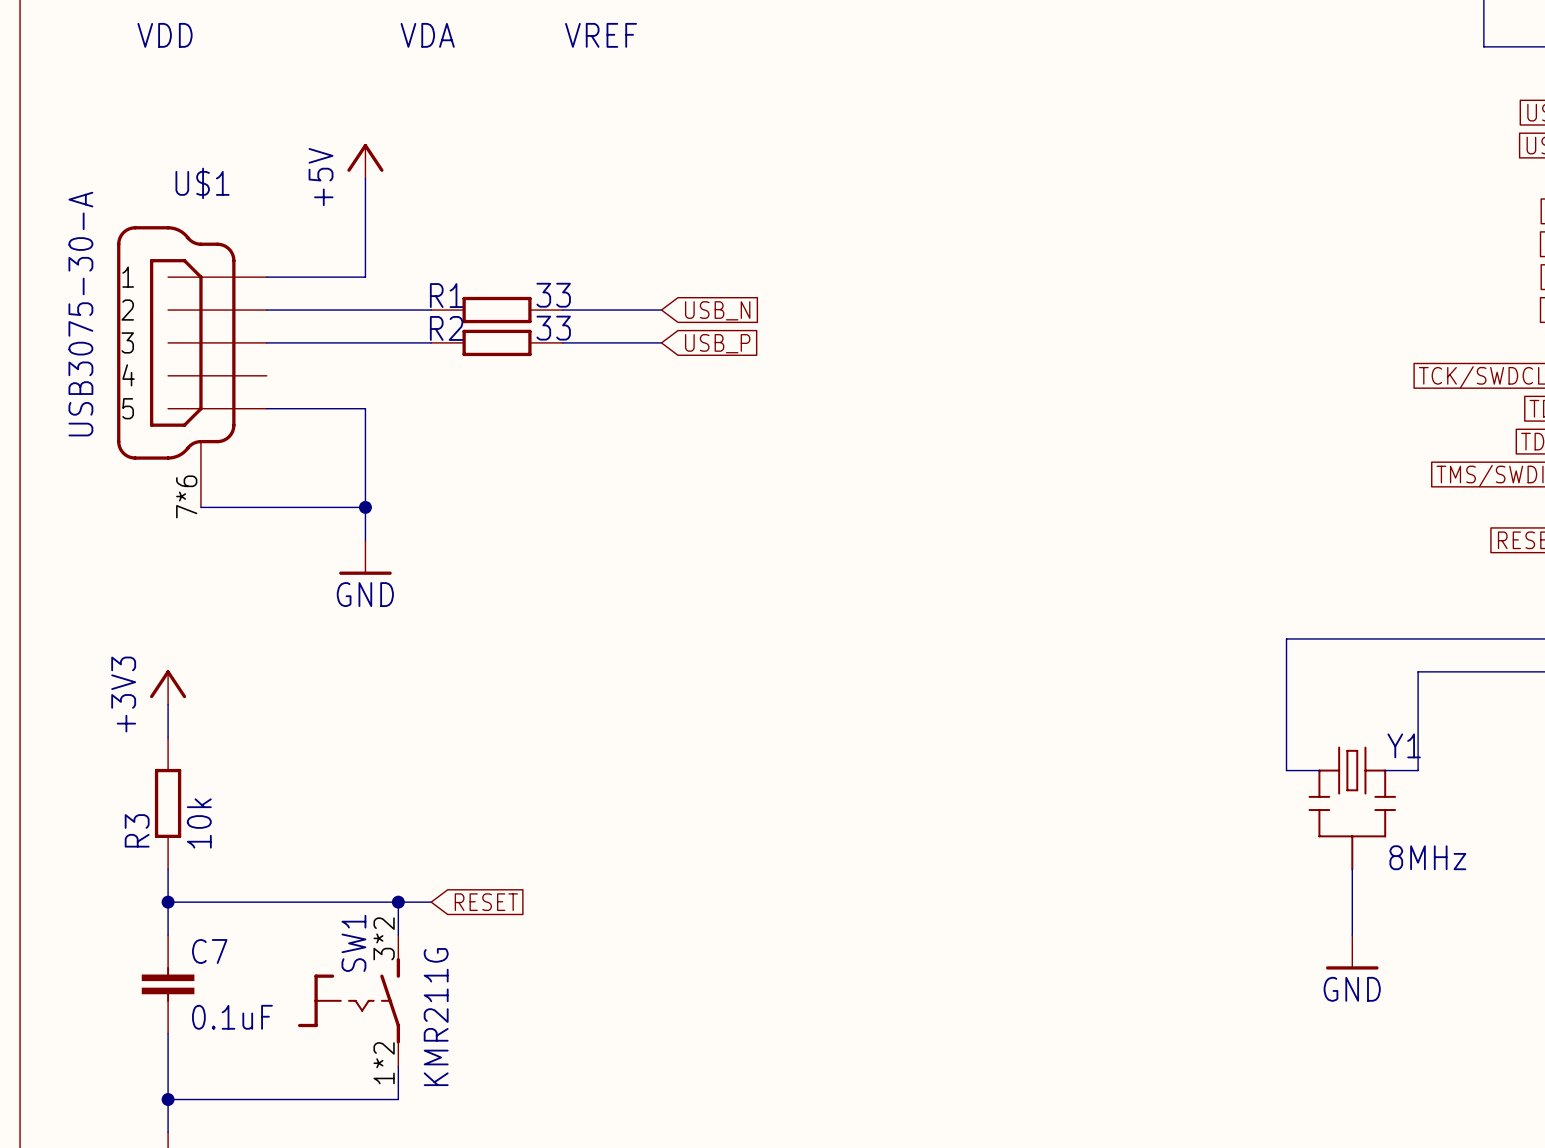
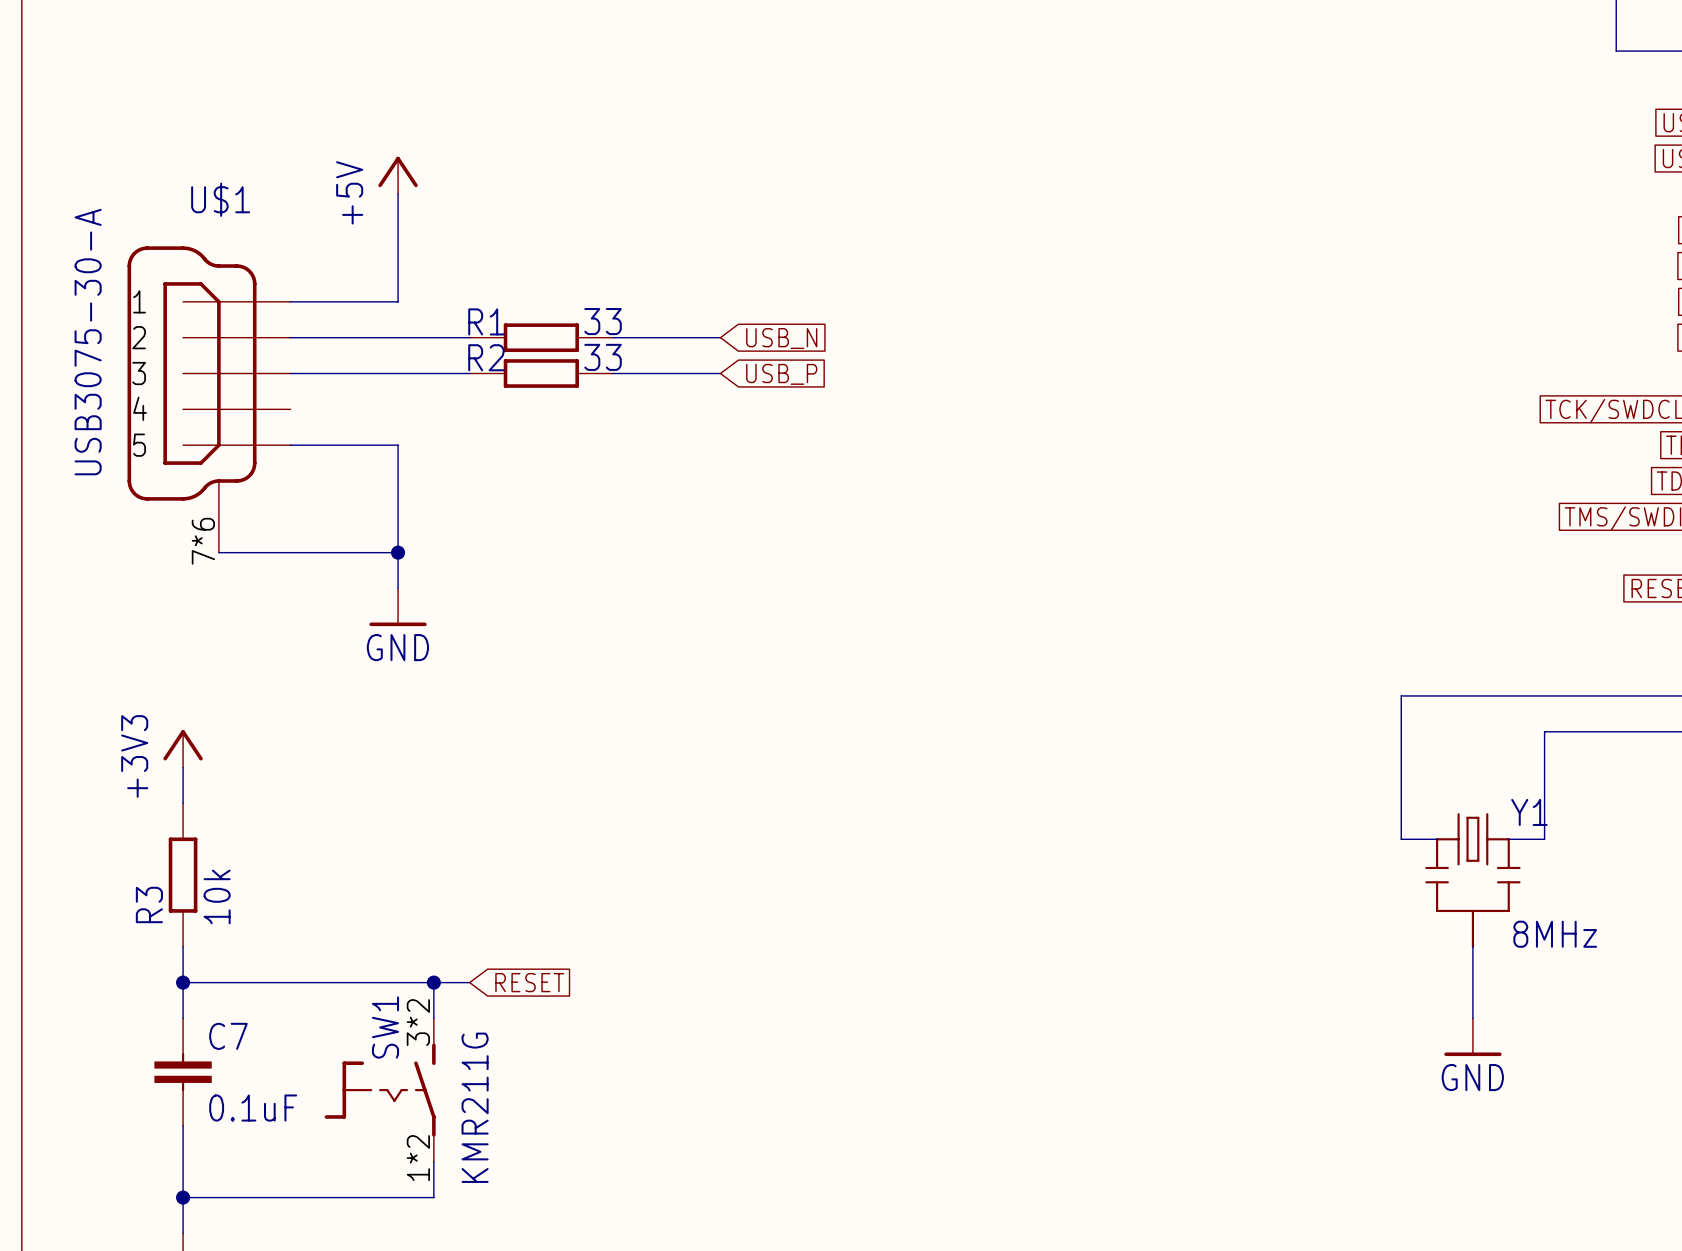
text: VDD (165, 35) -> none
text: VDA (427, 35) -> none
text: VREF (601, 35) -> none

